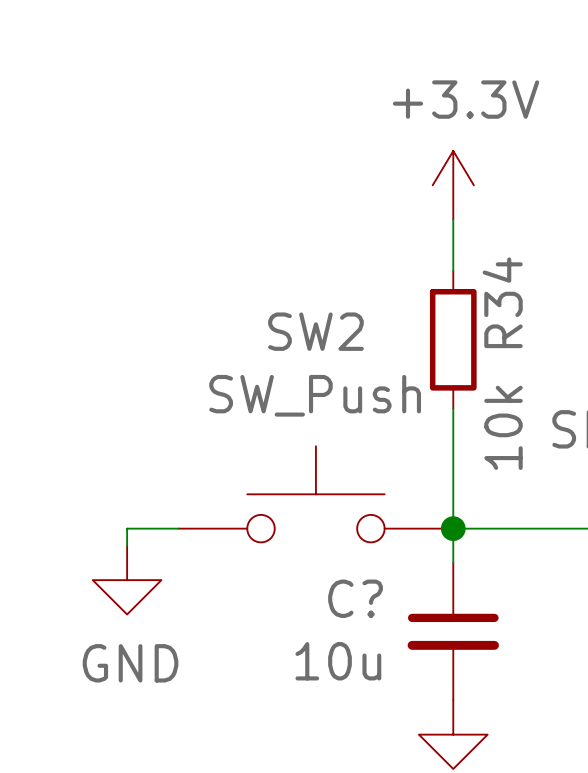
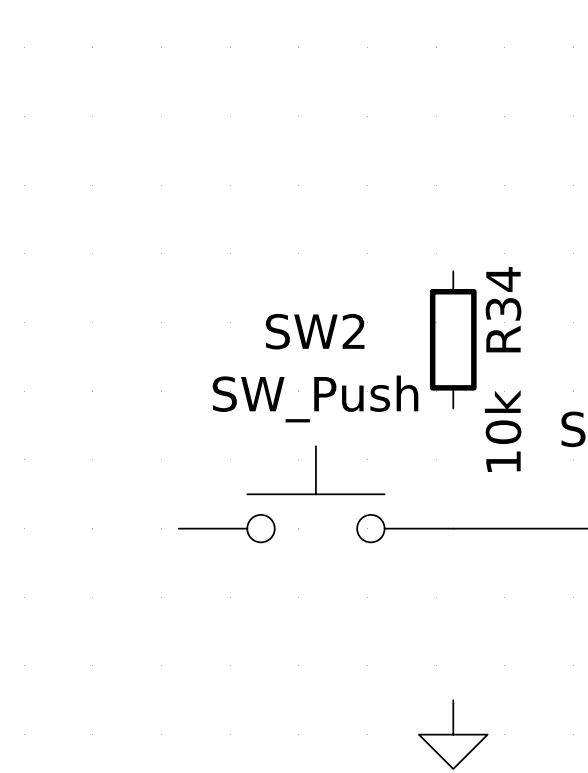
power symbol: +3.3V (453, 185) -> none
wire: (453, 219) (453, 271) -> none
wire: (453, 408) (453, 562) -> none
wire: (178, 528) (127, 528) (127, 545) -> none
junction: (453, 528) -> none
power symbol: GND (127, 580) -> none
C?: 10u (453, 631) -> none

